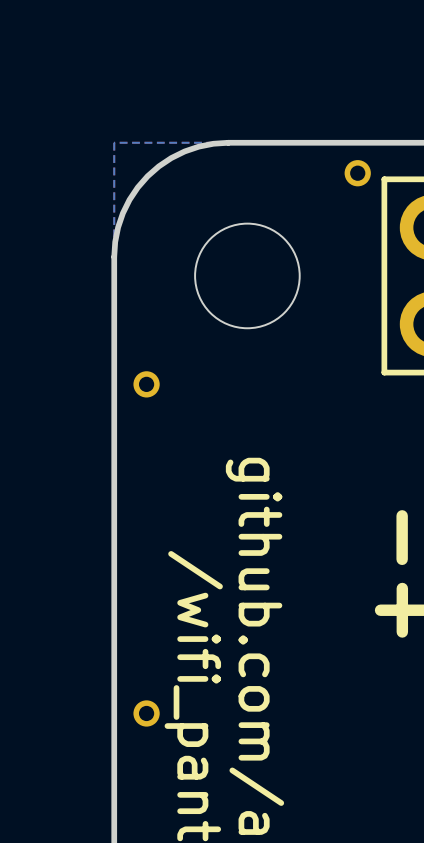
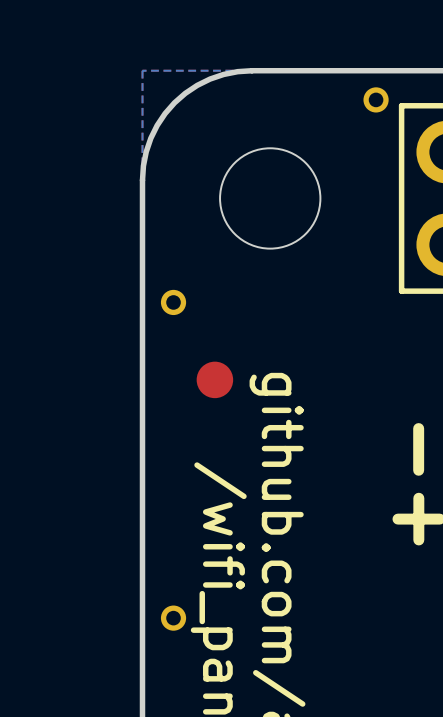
part: none -> (214, 379)

